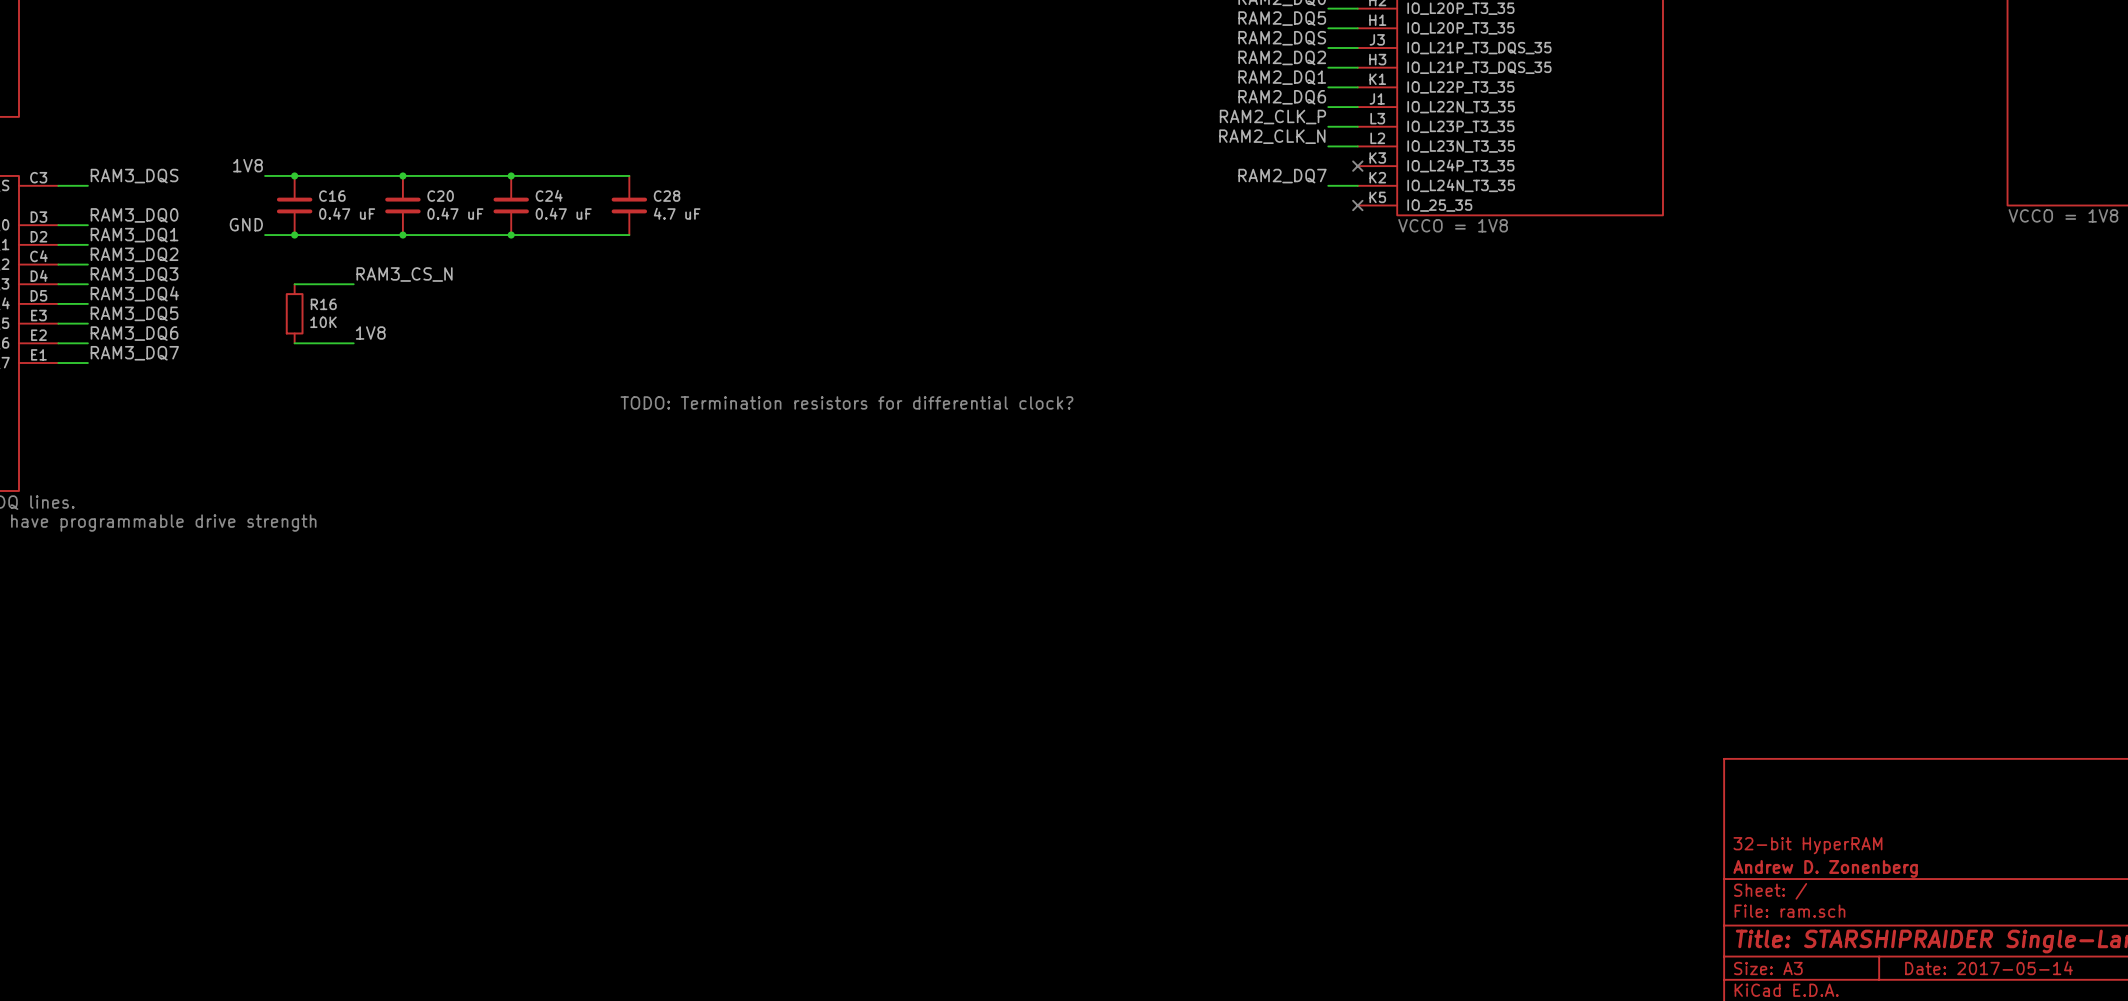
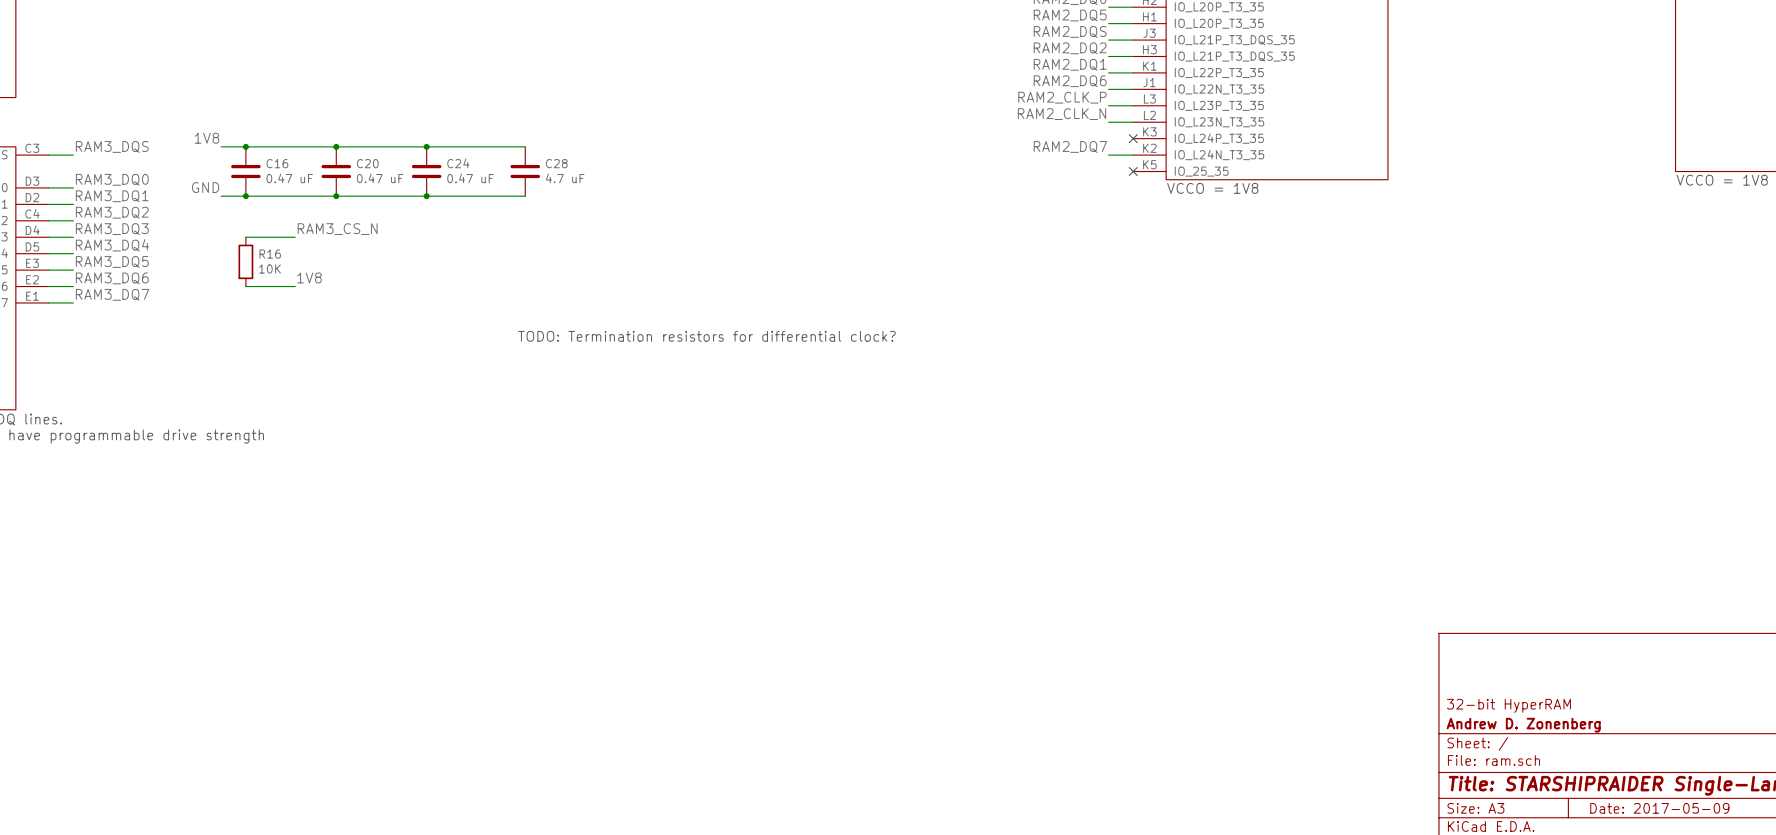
title block: Date: 2017-05-14 (1989, 968) -> Date: 2017-05-09 (1659, 808)

